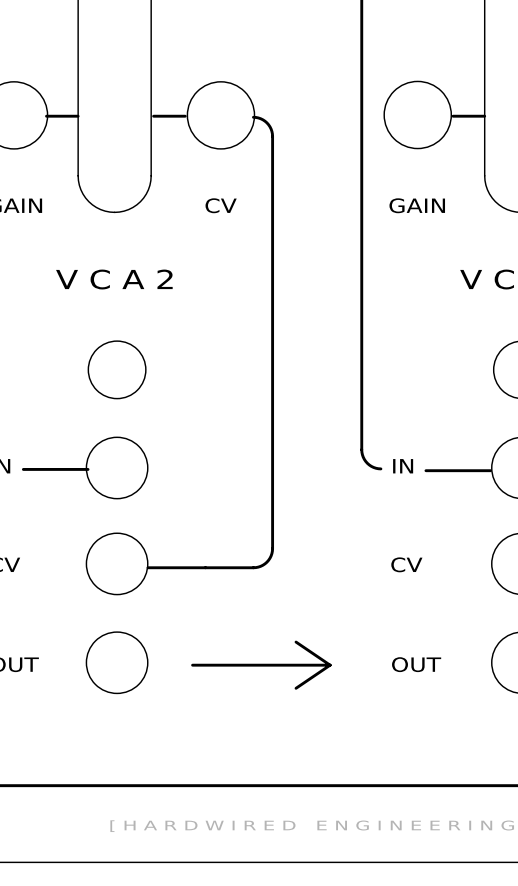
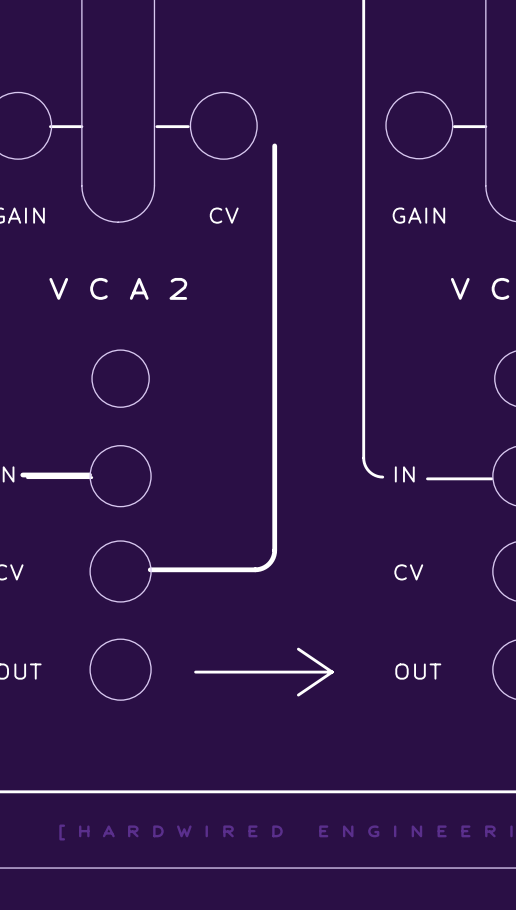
line: (253, 117) (266, 122) (272, 136) (271, 553) (266, 562) (255, 567) (147, 567) -> none
line: none -> (274, 145) (274, 555) (267, 565) (257, 569) (150, 569)
line: none -> (22, 474) (89, 474)

